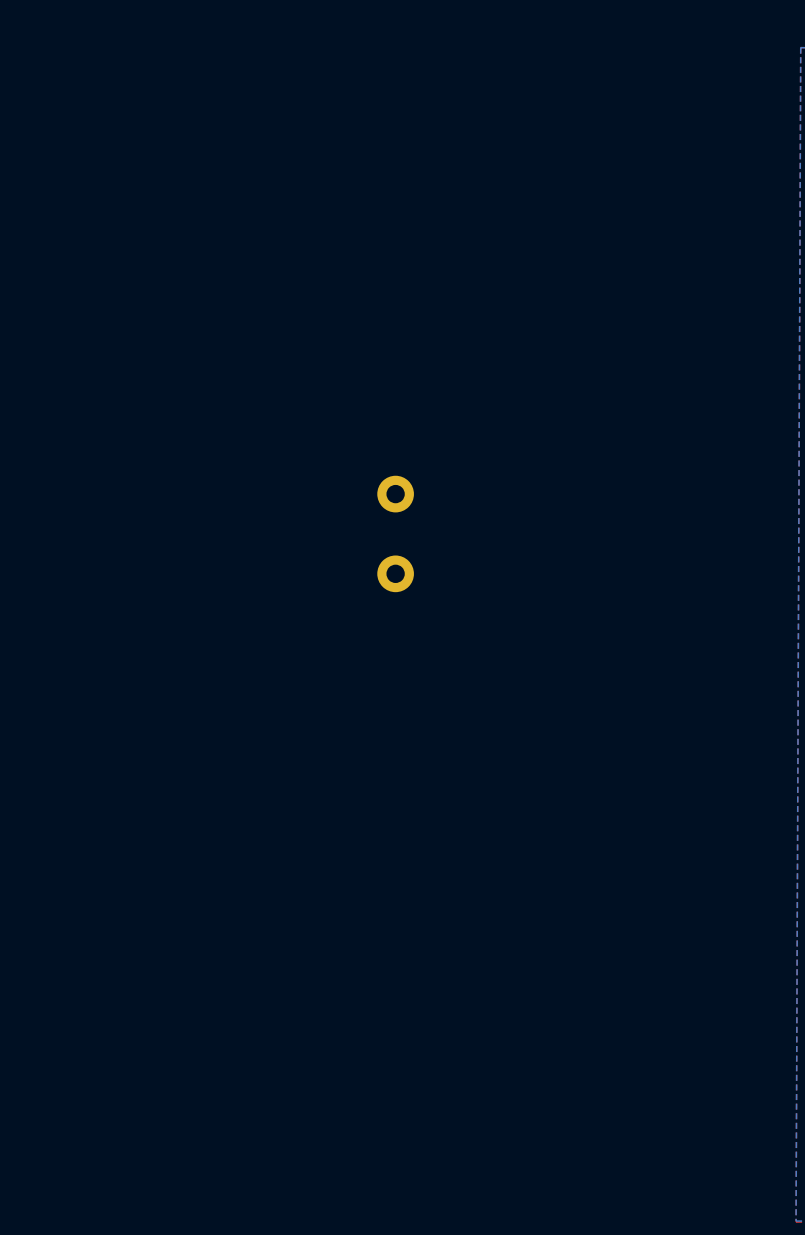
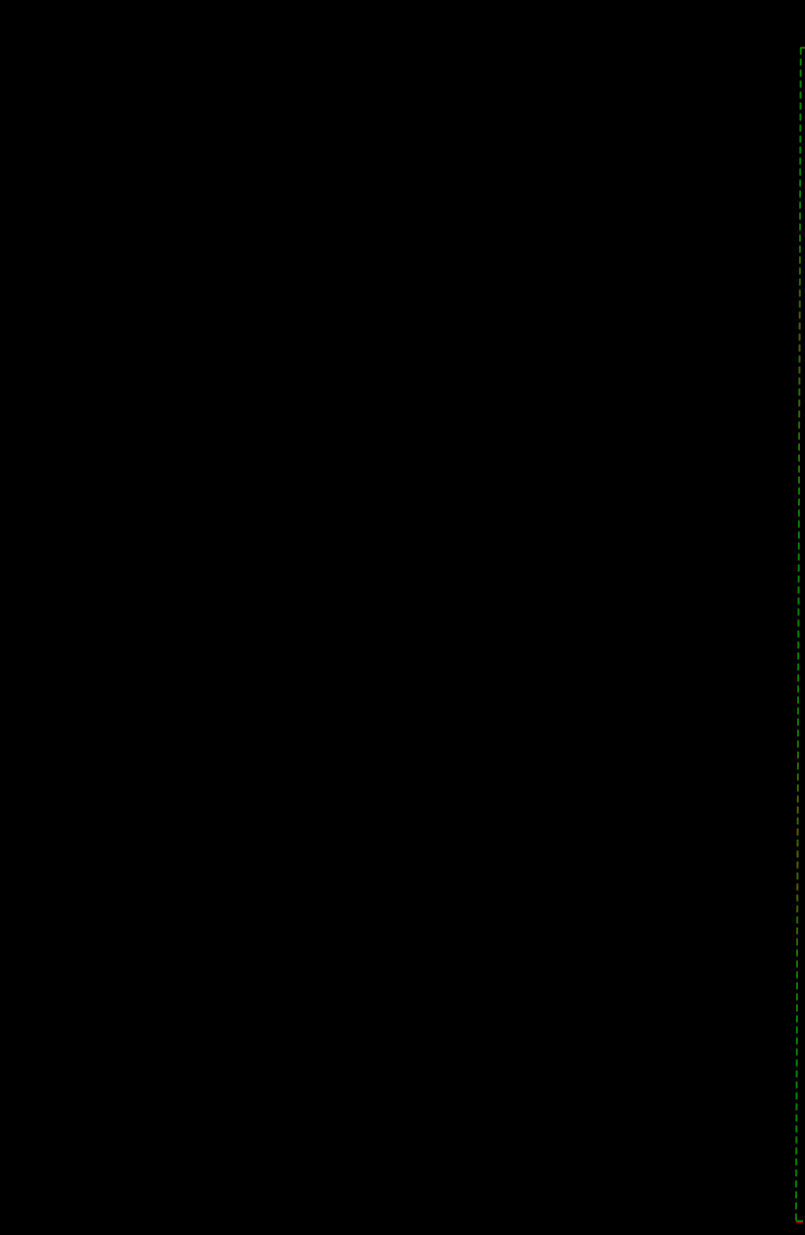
part: (395, 494) -> none
part: (395, 573) -> none

